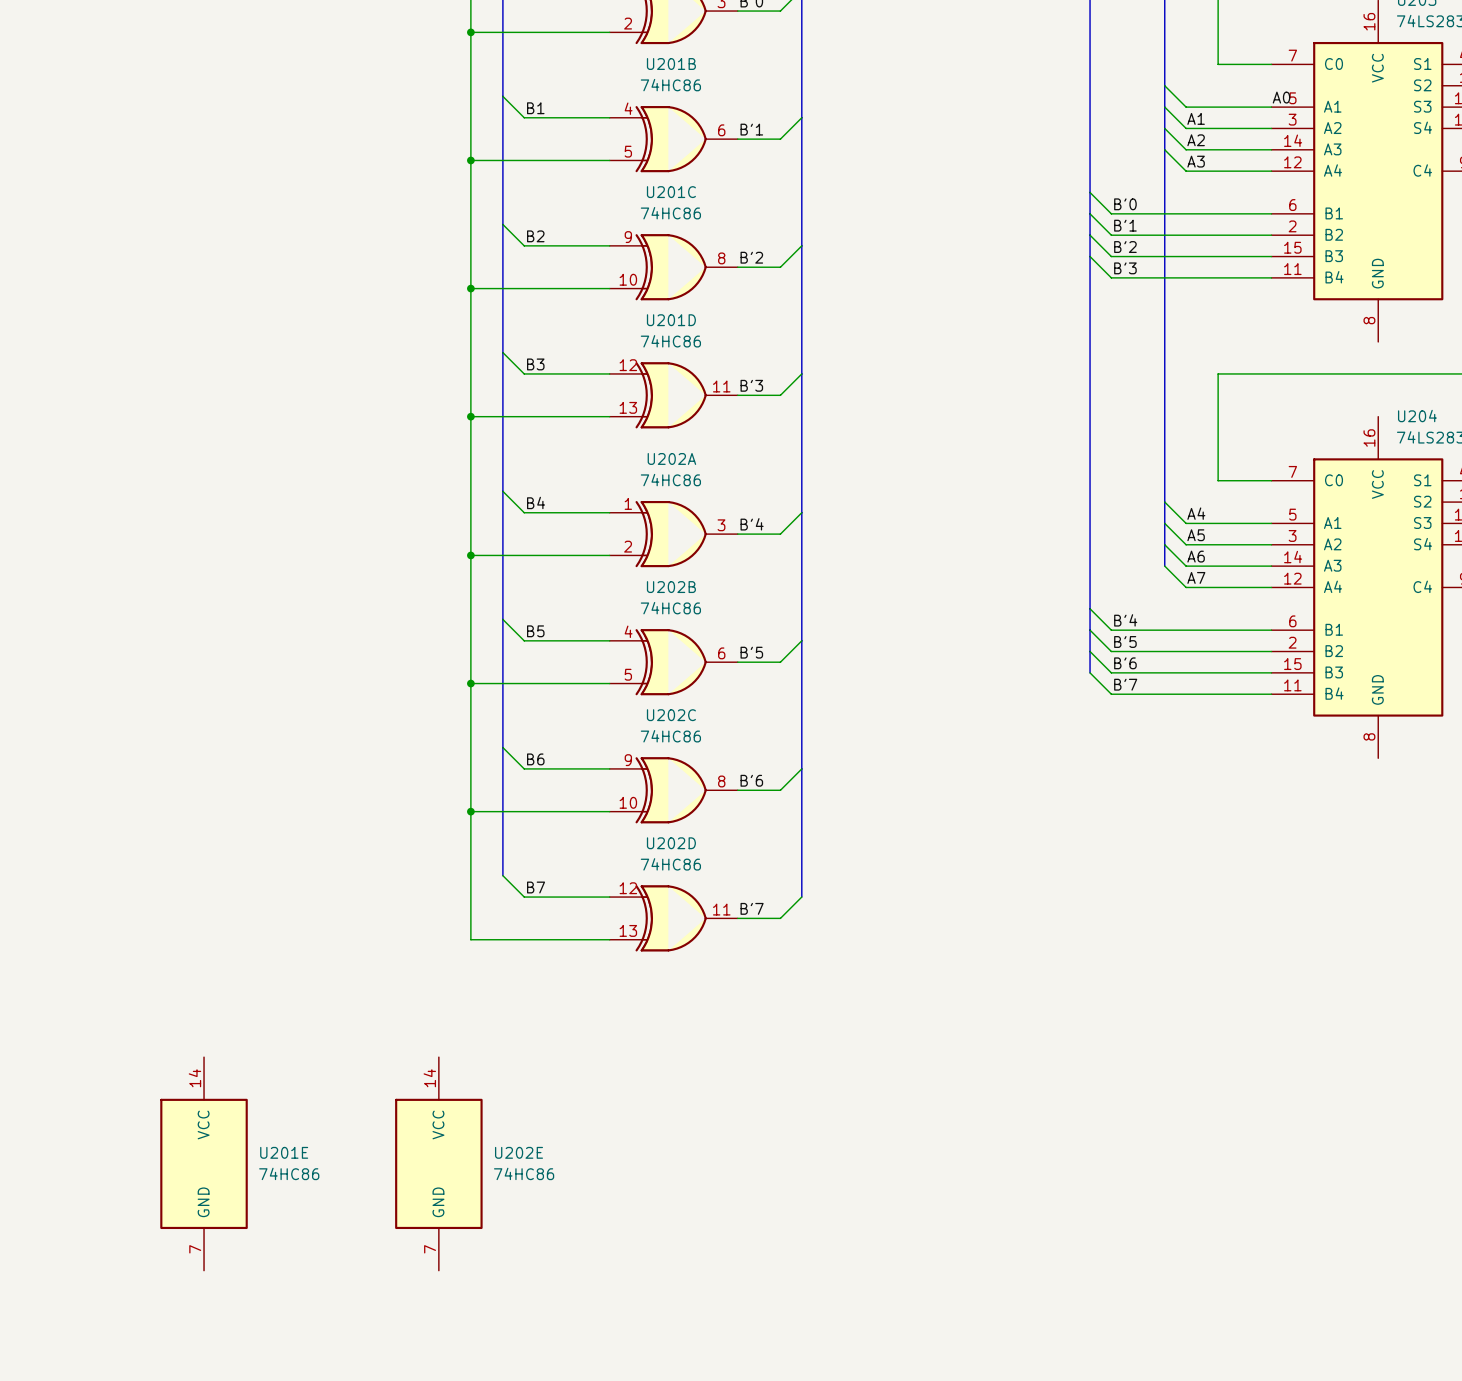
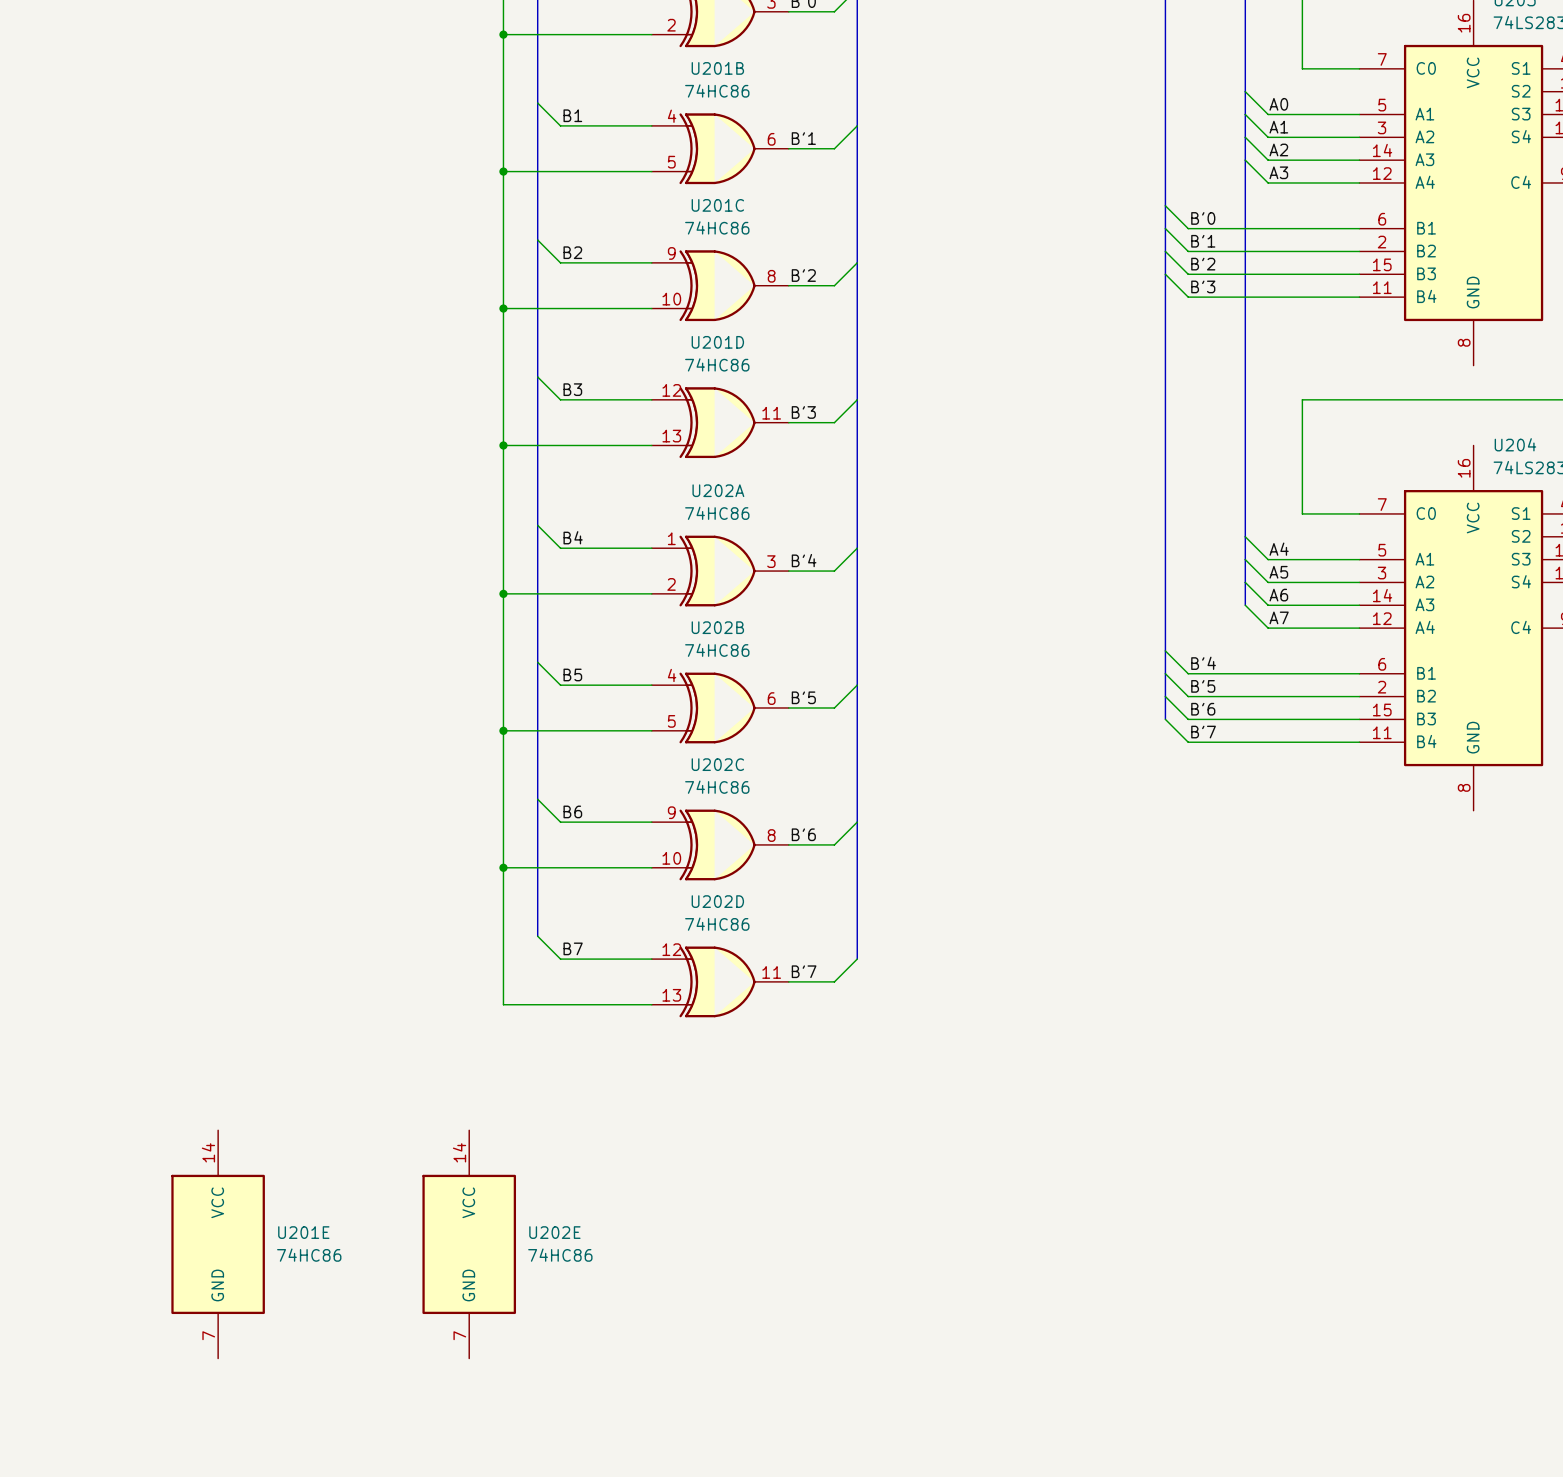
label position: A0 (1281, 97) -> A0 (1278, 104)

